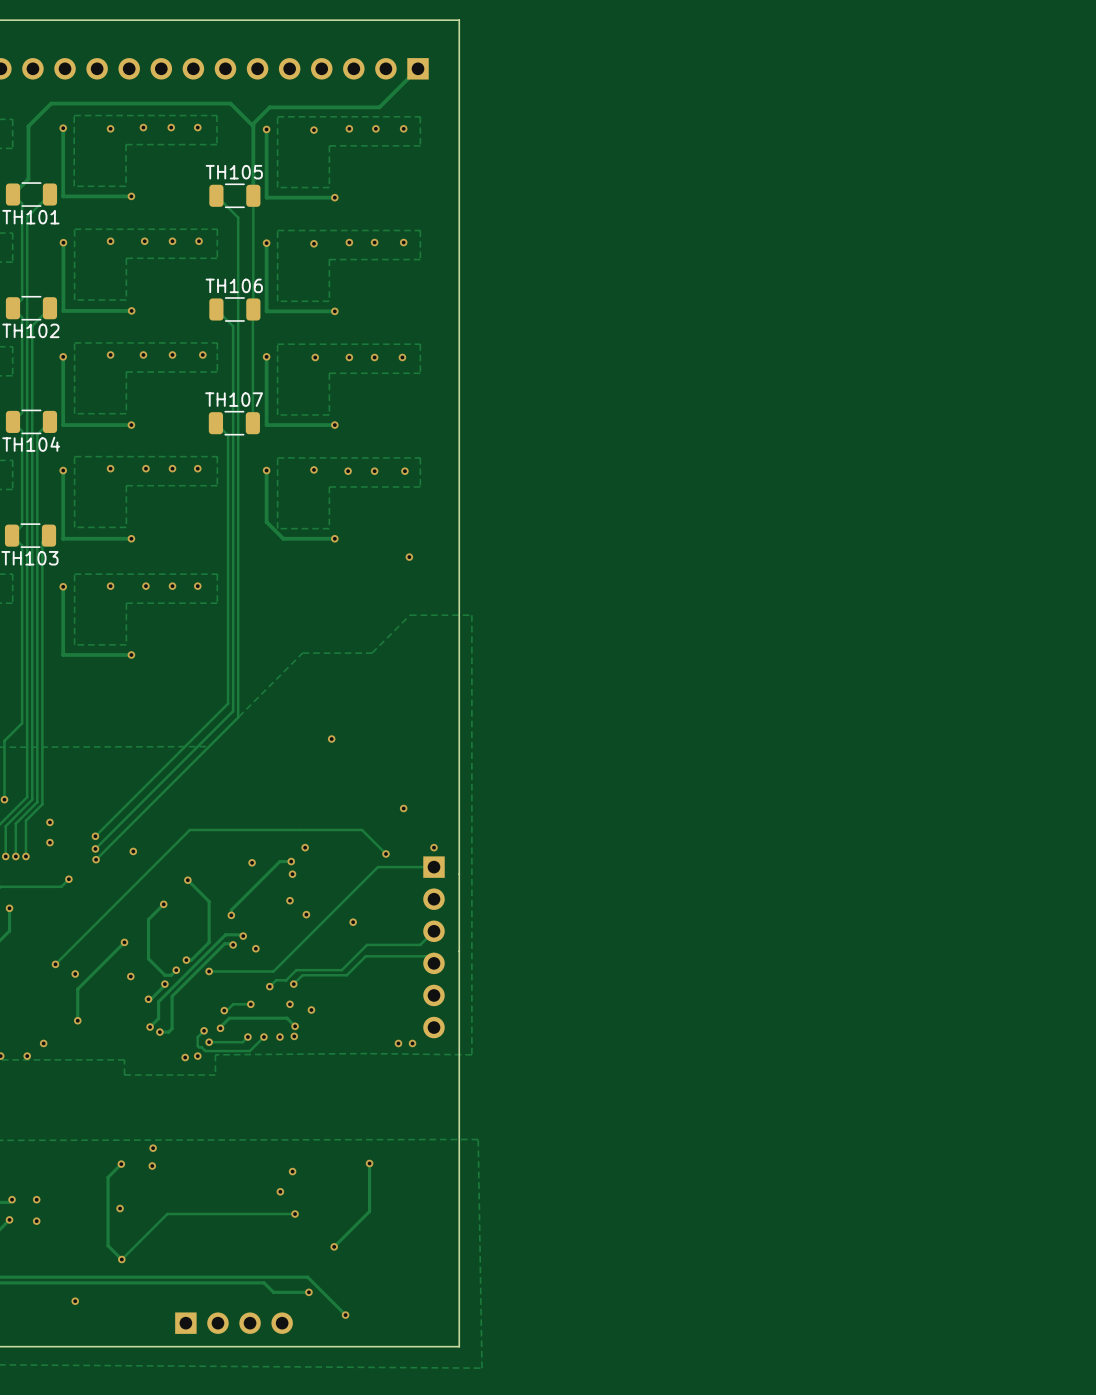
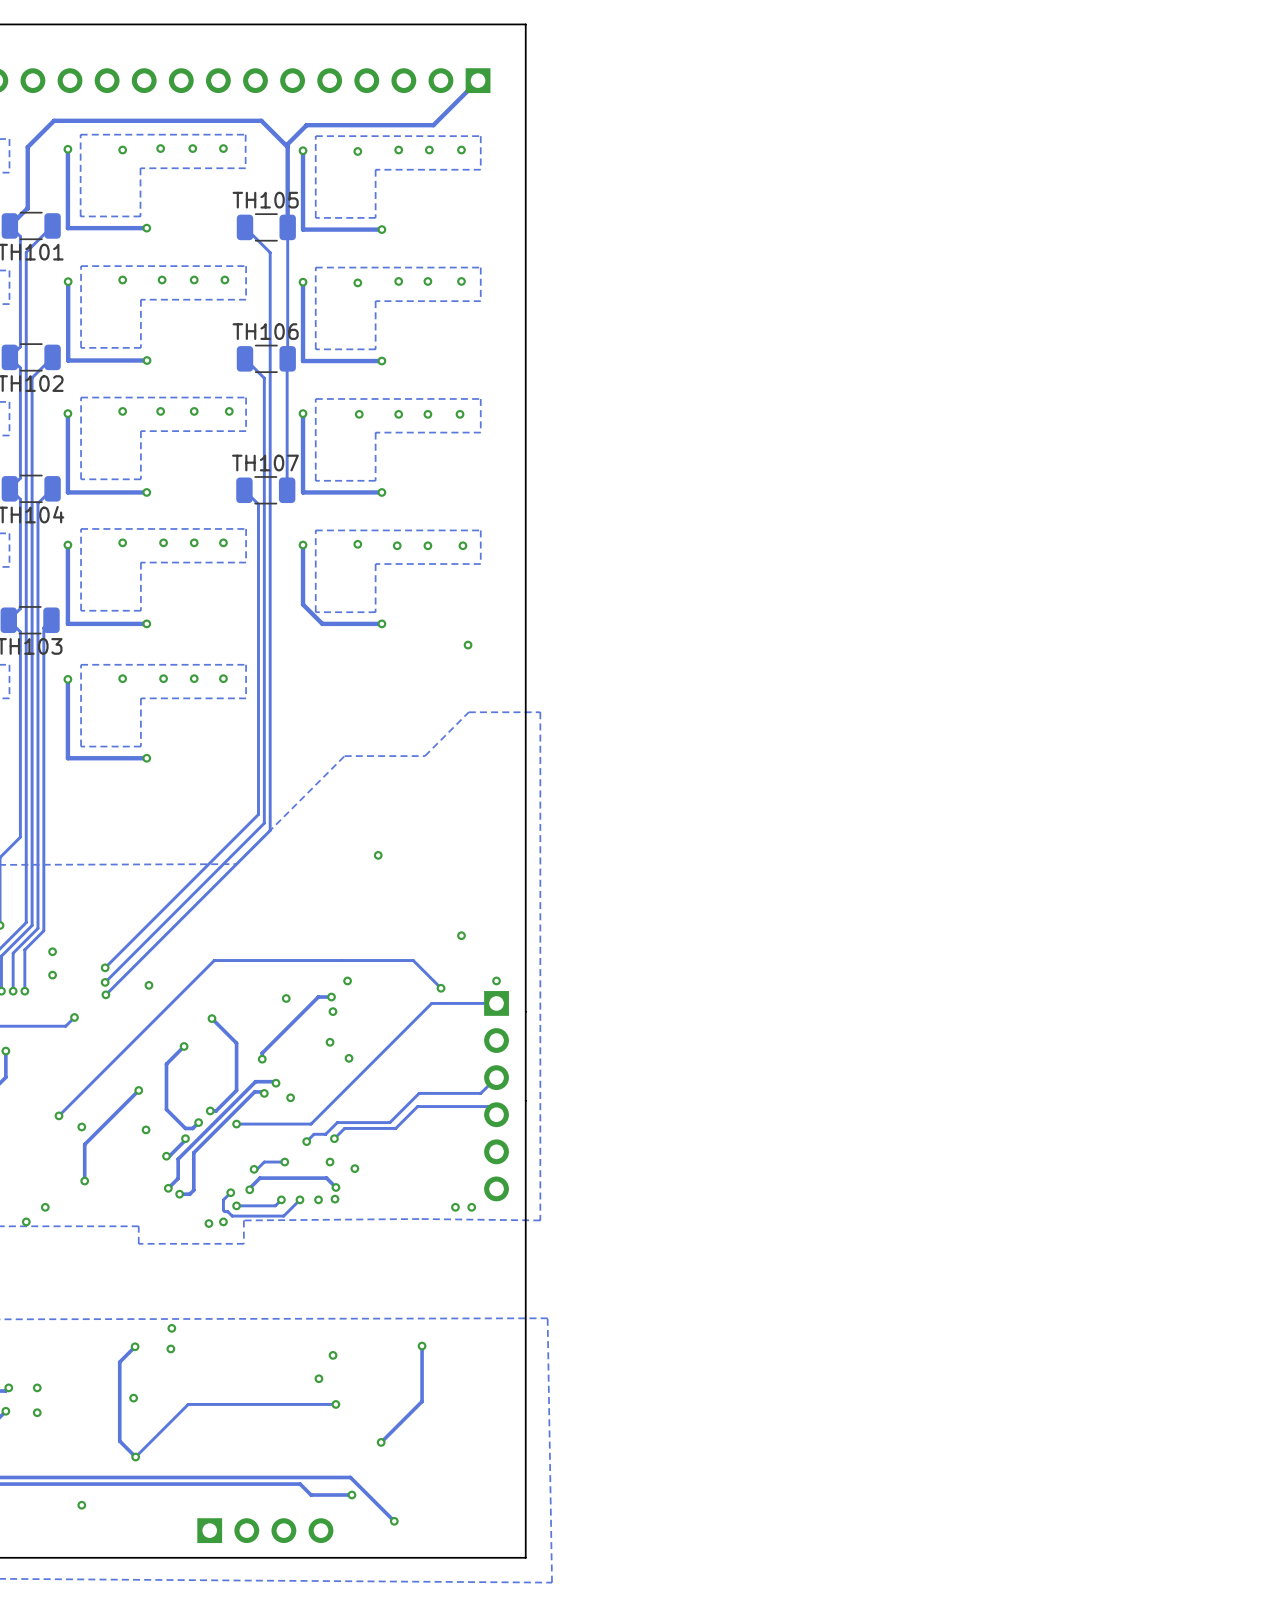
via: (353, 922) -> none

